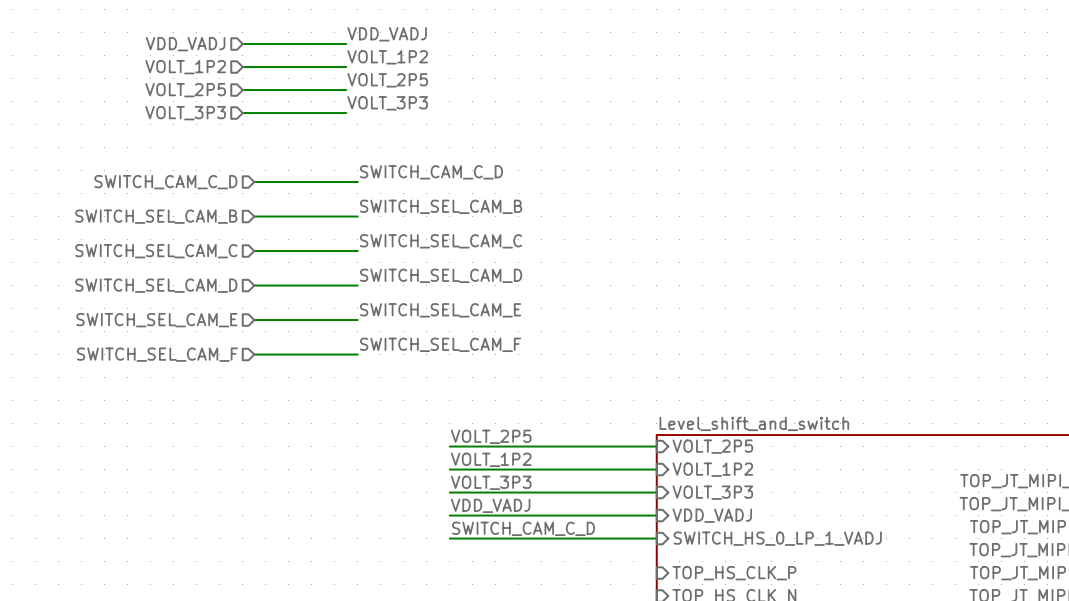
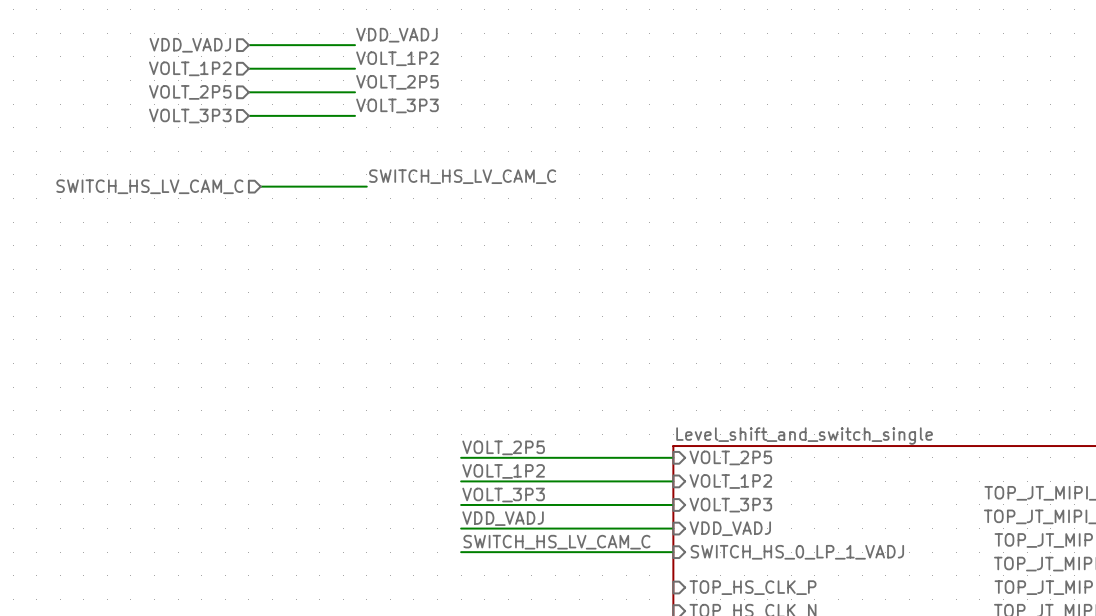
label: SWITCH_CAM_C_D (431, 172) -> SWITCH_HS_LV_CAM_C (462, 176)
hierarchical label: SWITCH_CAM_C_D (165, 182) -> SWITCH_HS_LV_CAM_C (149, 186)
label: SWITCH_SEL_CAM_B (441, 206) -> none
hierarchical label: SWITCH_SEL_CAM_B (156, 216) -> none
wire: (254, 216) (357, 216) -> none
label: SWITCH_SEL_CAM_C (441, 241) -> none
hierarchical label: SWITCH_SEL_CAM_C (156, 251) -> none
wire: (254, 251) (357, 251) -> none
label: SWITCH_SEL_CAM_D (441, 275) -> none
hierarchical label: SWITCH_SEL_CAM_D (156, 285) -> none
wire: (254, 285) (357, 285) -> none
label: SWITCH_SEL_CAM_E (440, 310) -> none
hierarchical label: SWITCH_SEL_CAM_E (156, 320) -> none
wire: (254, 320) (357, 320) -> none
label: SWITCH_SEL_CAM_F (440, 344) -> none
hierarchical label: SWITCH_SEL_CAM_F (157, 354) -> none
wire: (254, 354) (357, 354) -> none
sheet Level_shift_and_switch name: Level_shift_and_switch (754, 423) -> Level_shift_and_switch_single (804, 436)
label: SWITCH_CAM_C_D (523, 528) -> SWITCH_HS_LV_CAM_C (556, 542)

